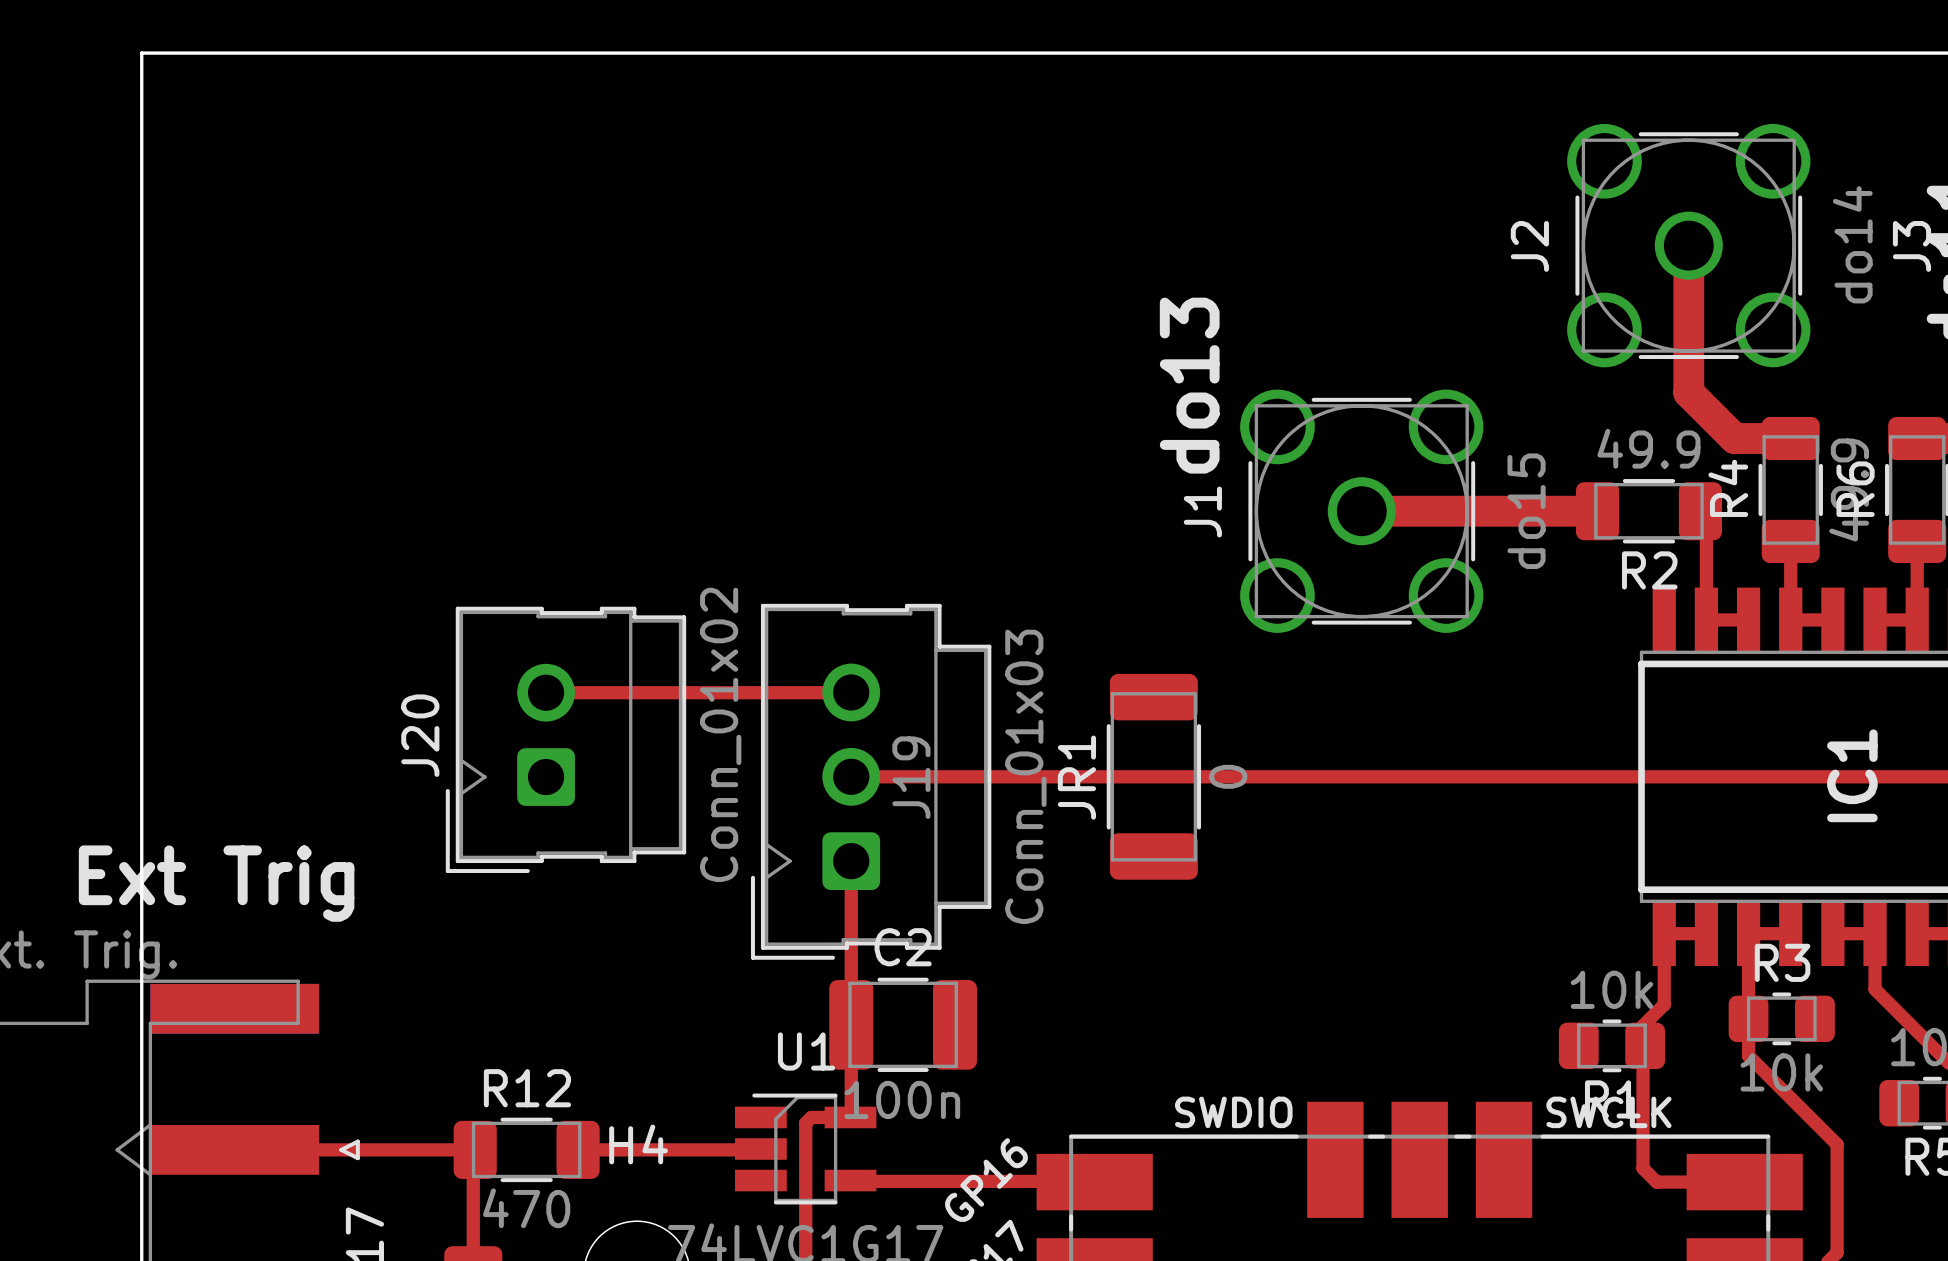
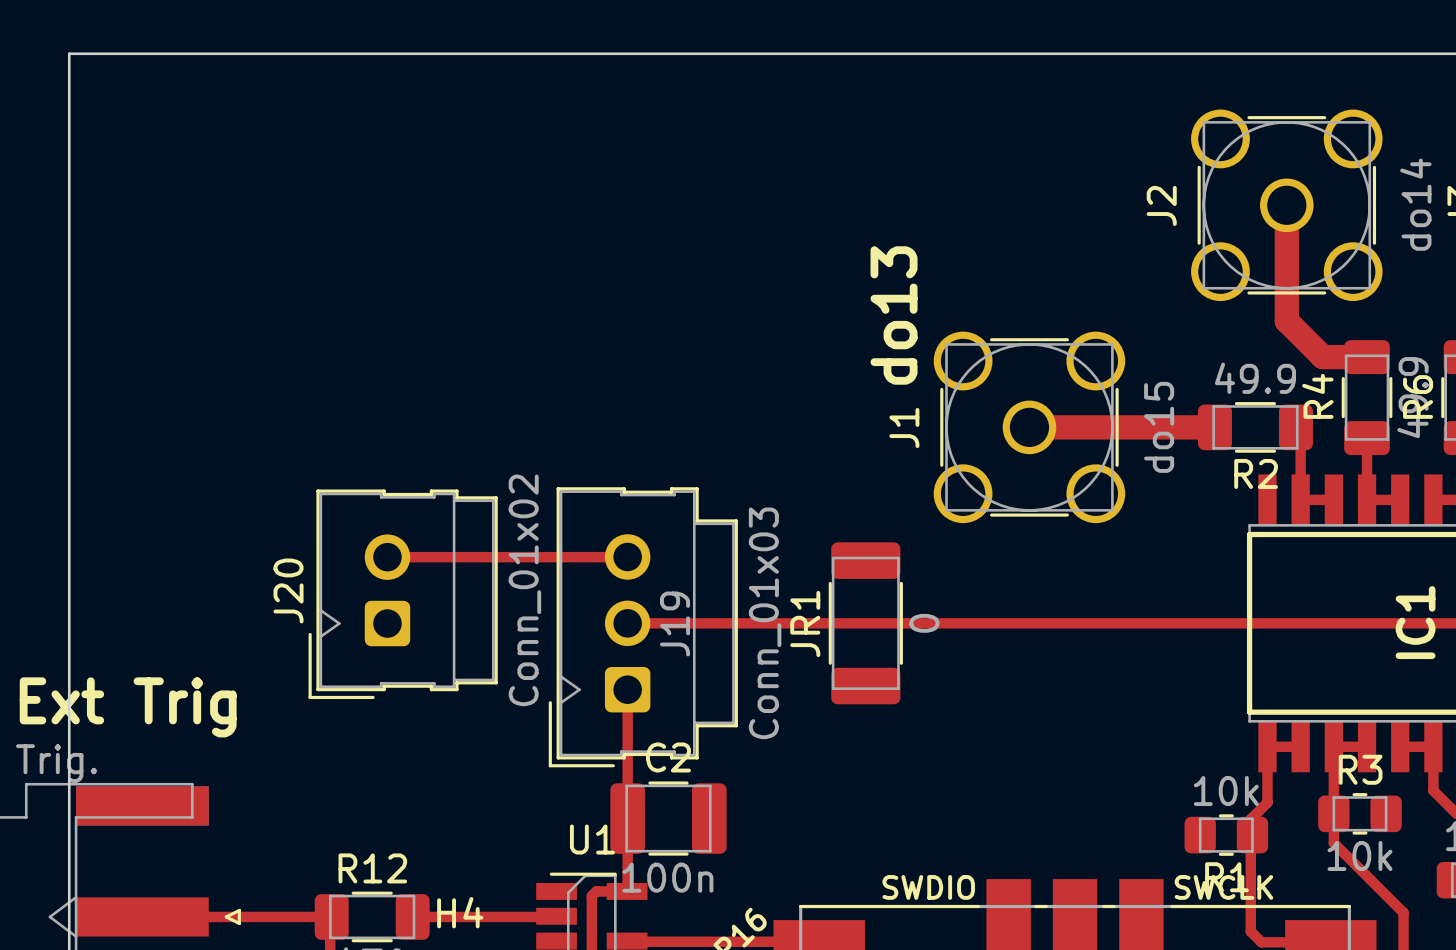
top track: (1361, 511) (1597, 511) -> (1029, 427) (1214, 427)
J1 position: (1361, 511) -> (1029, 427)
R2 position: (1648, 511) -> (1255, 427)

